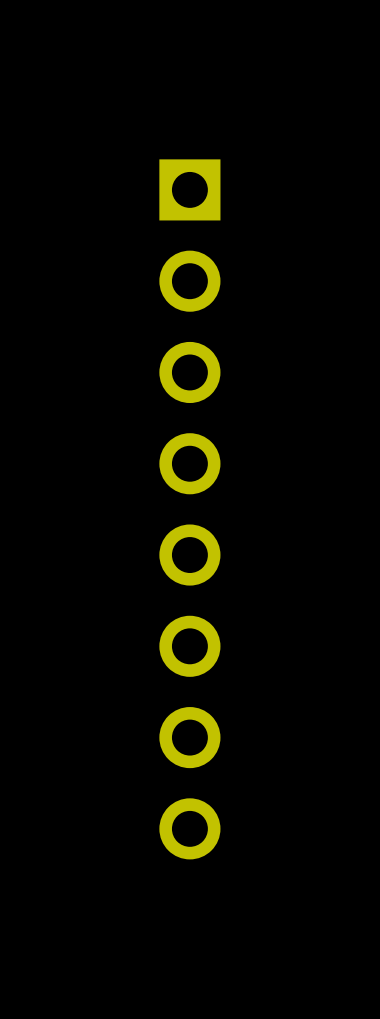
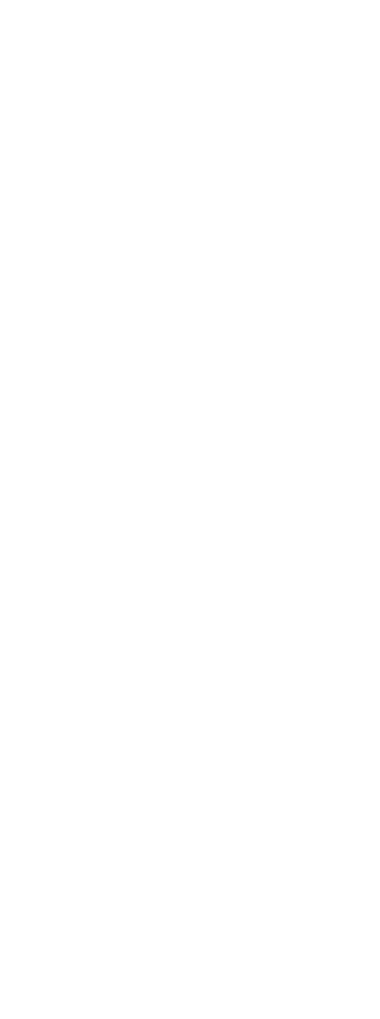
part: (189, 509) -> none

